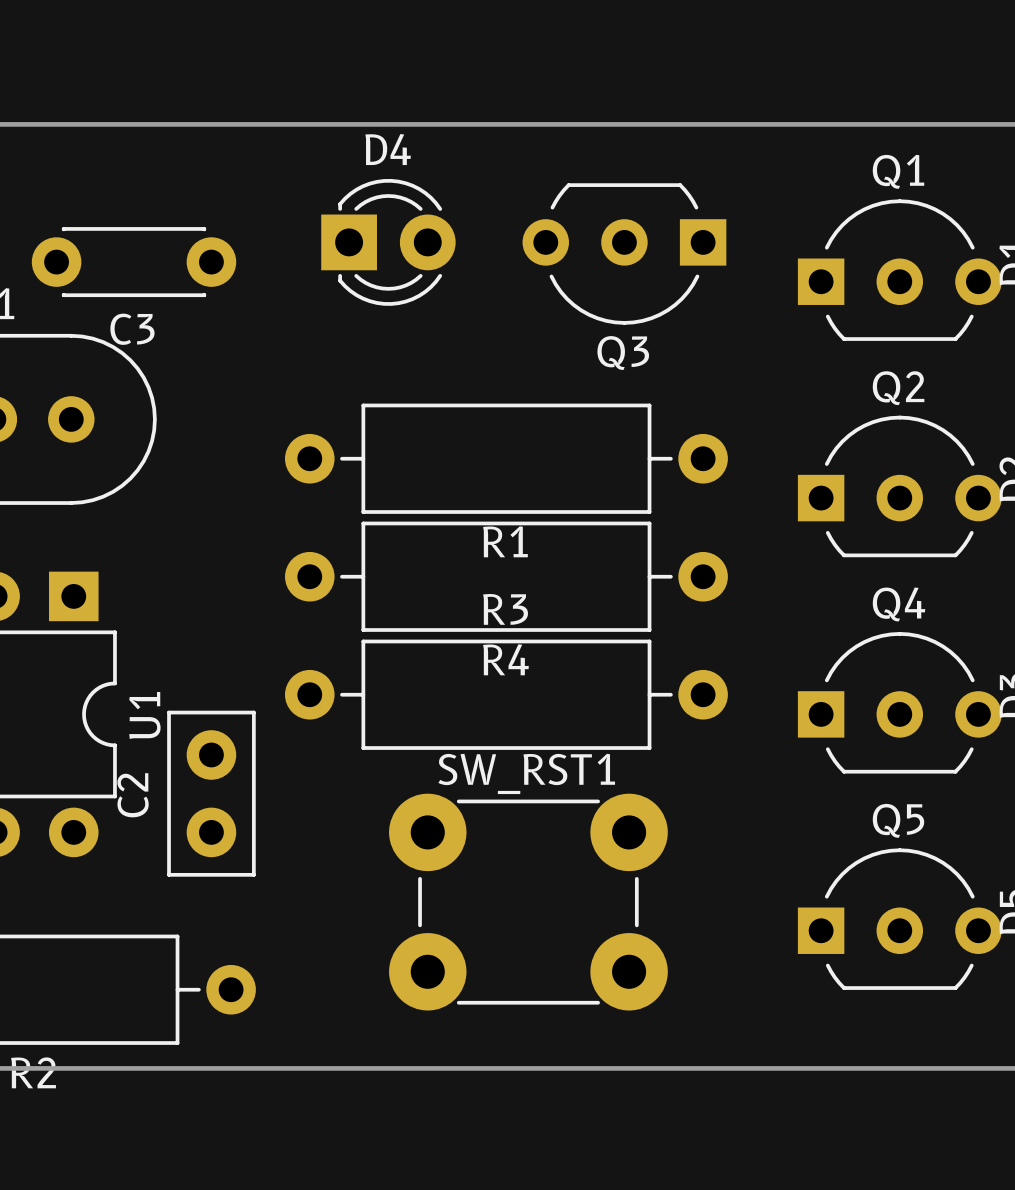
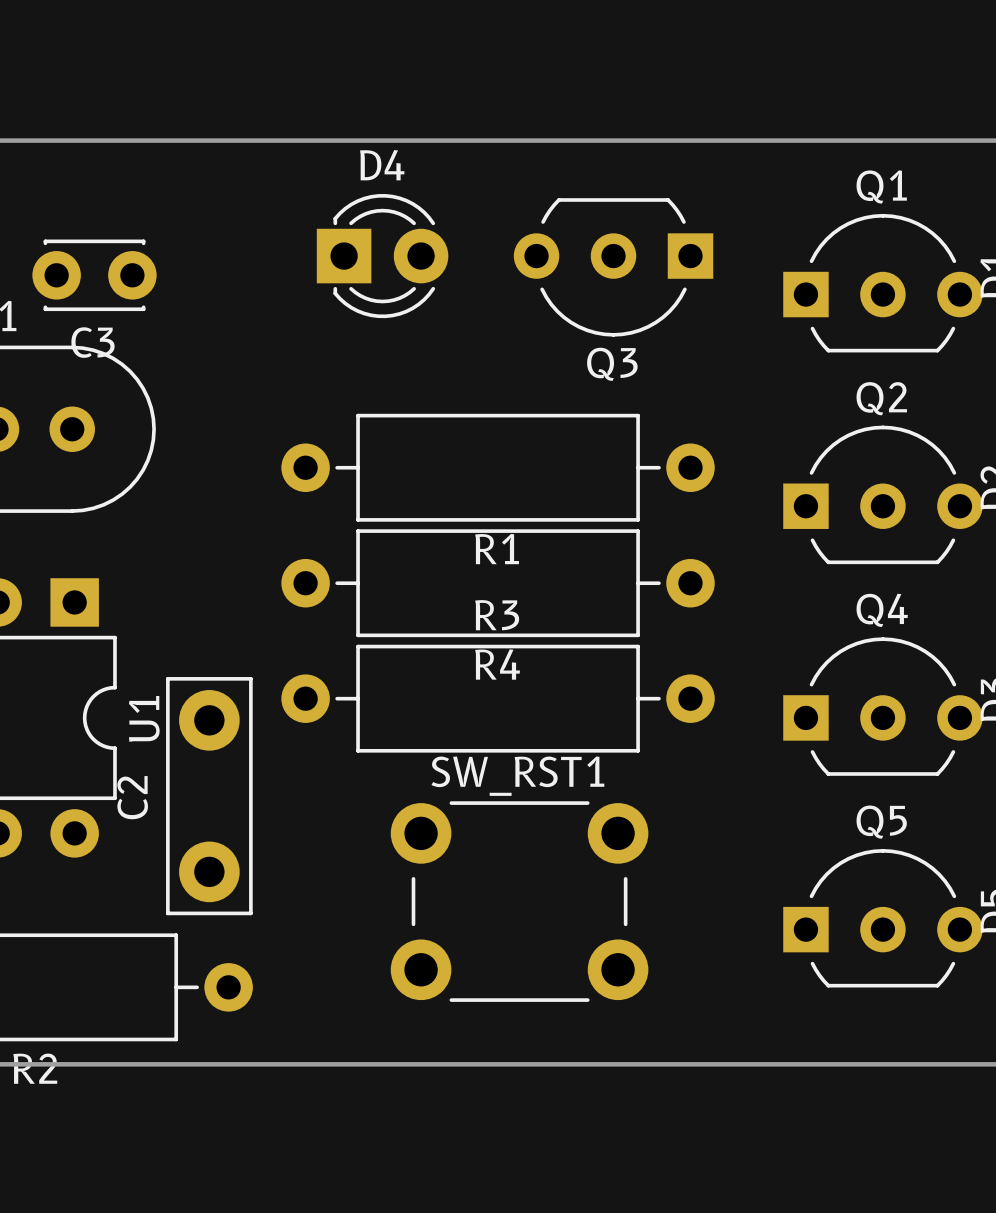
C3 footprint: [31, 227, 237, 298] -> [32, 239, 157, 312]
C2 footprint: [167, 710, 256, 877] -> [166, 677, 253, 916]
SW_RST1 footprint: [389, 793, 668, 1011] -> [390, 801, 649, 1002]

